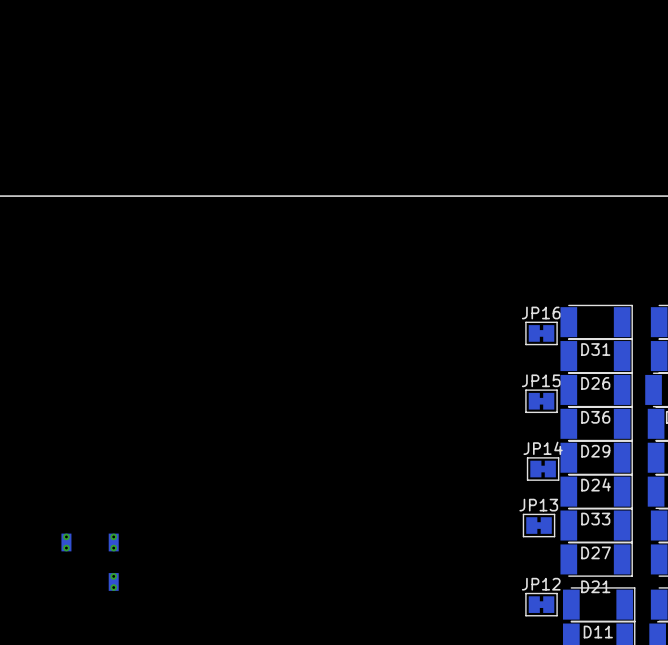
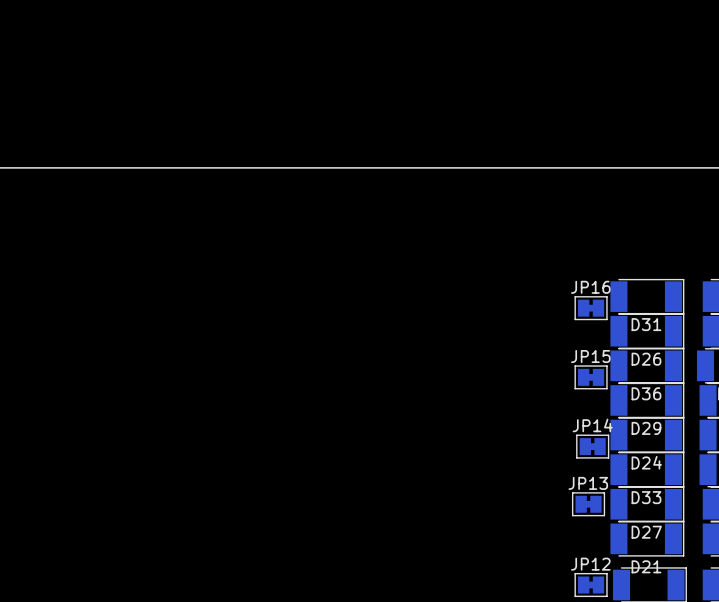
part: (66, 542) -> none
part: (113, 542) -> none
part: (113, 581) -> none

